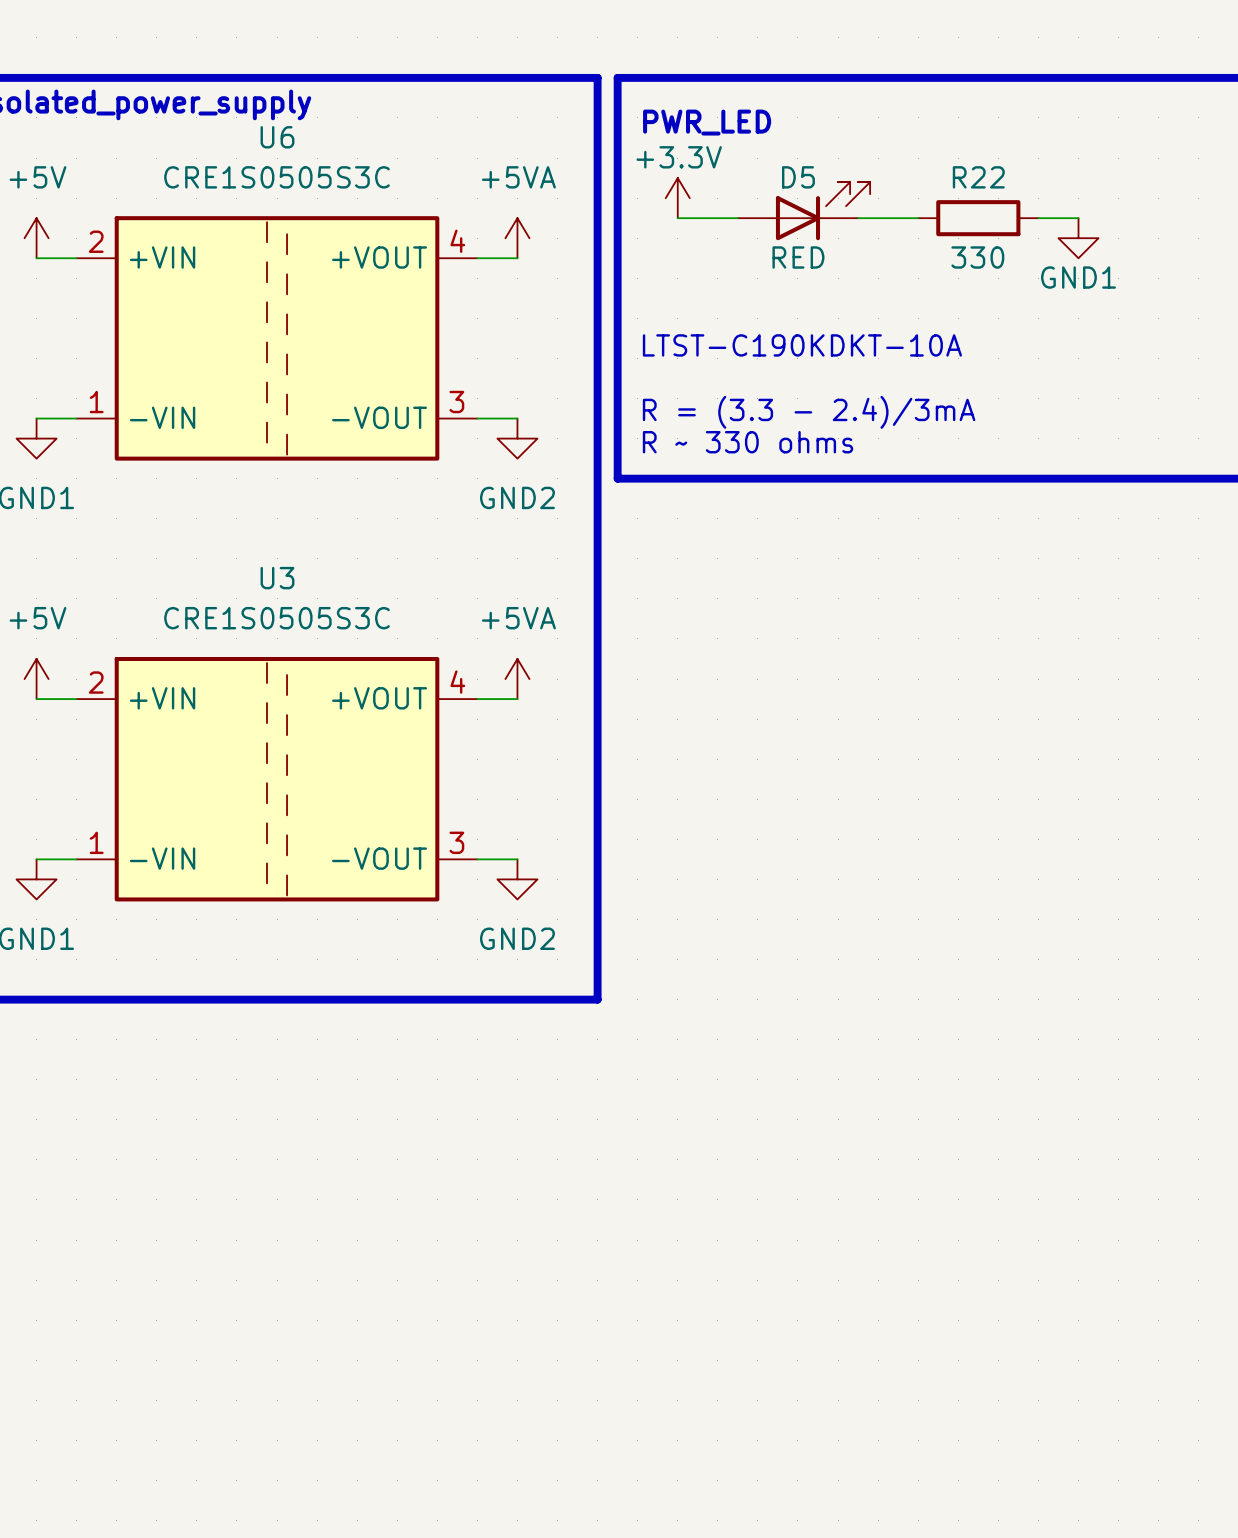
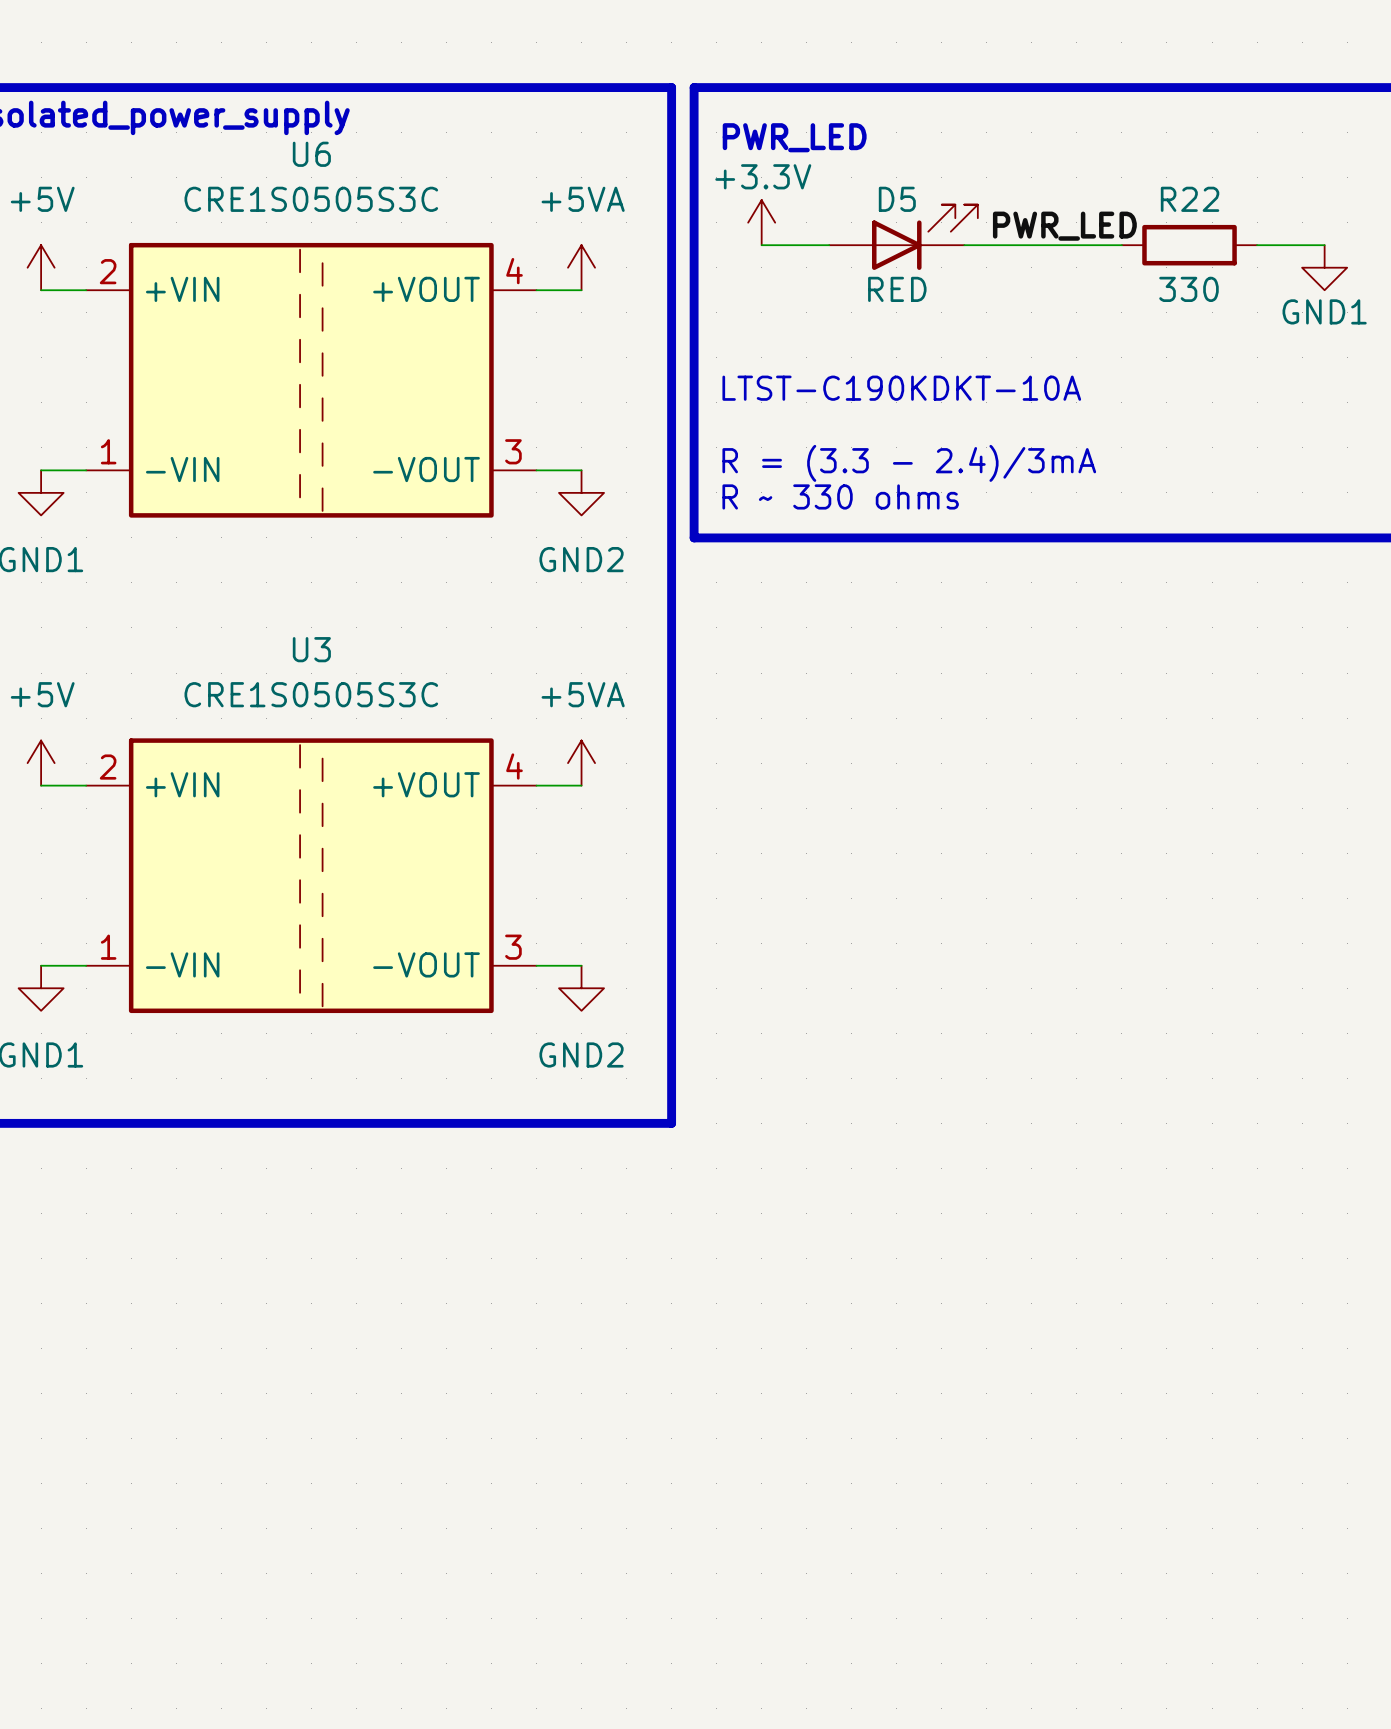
label: none -> PWR_LED (1064, 226)
wire: none -> (1031, 245) (1121, 245)
R22 position: (978, 218) -> (1189, 245)
wire: (1038, 218) (1078, 218) -> none
wire: none -> (1257, 245) (1324, 245)
power symbol position: GND1 (1078, 238) -> GND1 (1324, 267)

